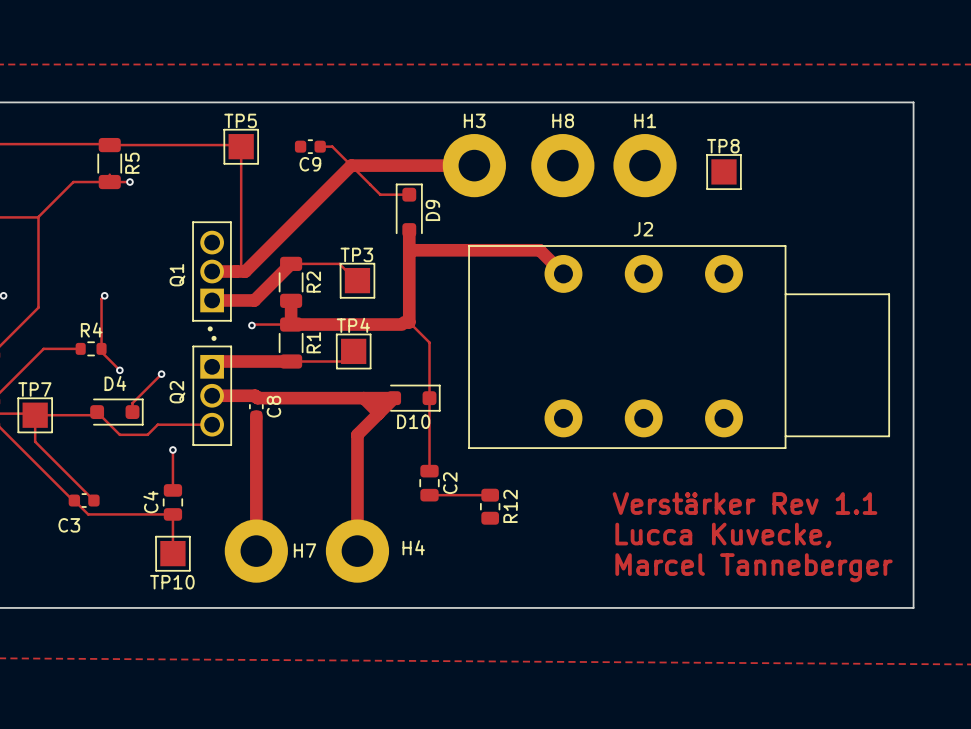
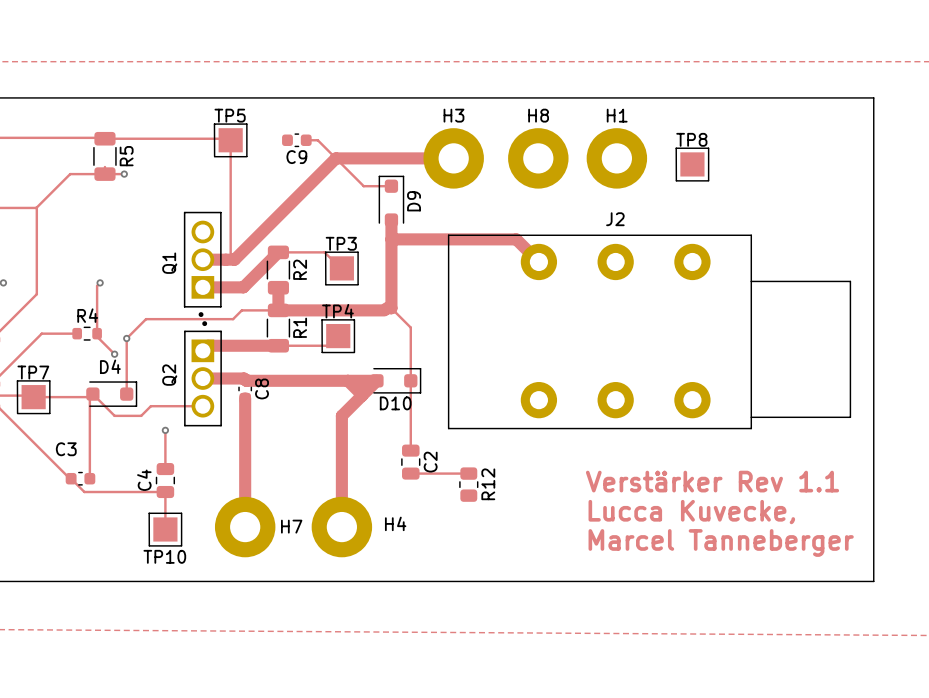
via: (251, 325) -> none
track: (161, 374) (132, 403) -> (240, 311) (233, 319) (146, 319) (126, 338) (126, 385)
via position: (161, 374) -> (126, 338)
track: (35, 415) (35, 441) (93, 500) -> (89, 397) (89, 478)
C3 name position: C3 (69, 525) -> C3 (66, 449)

